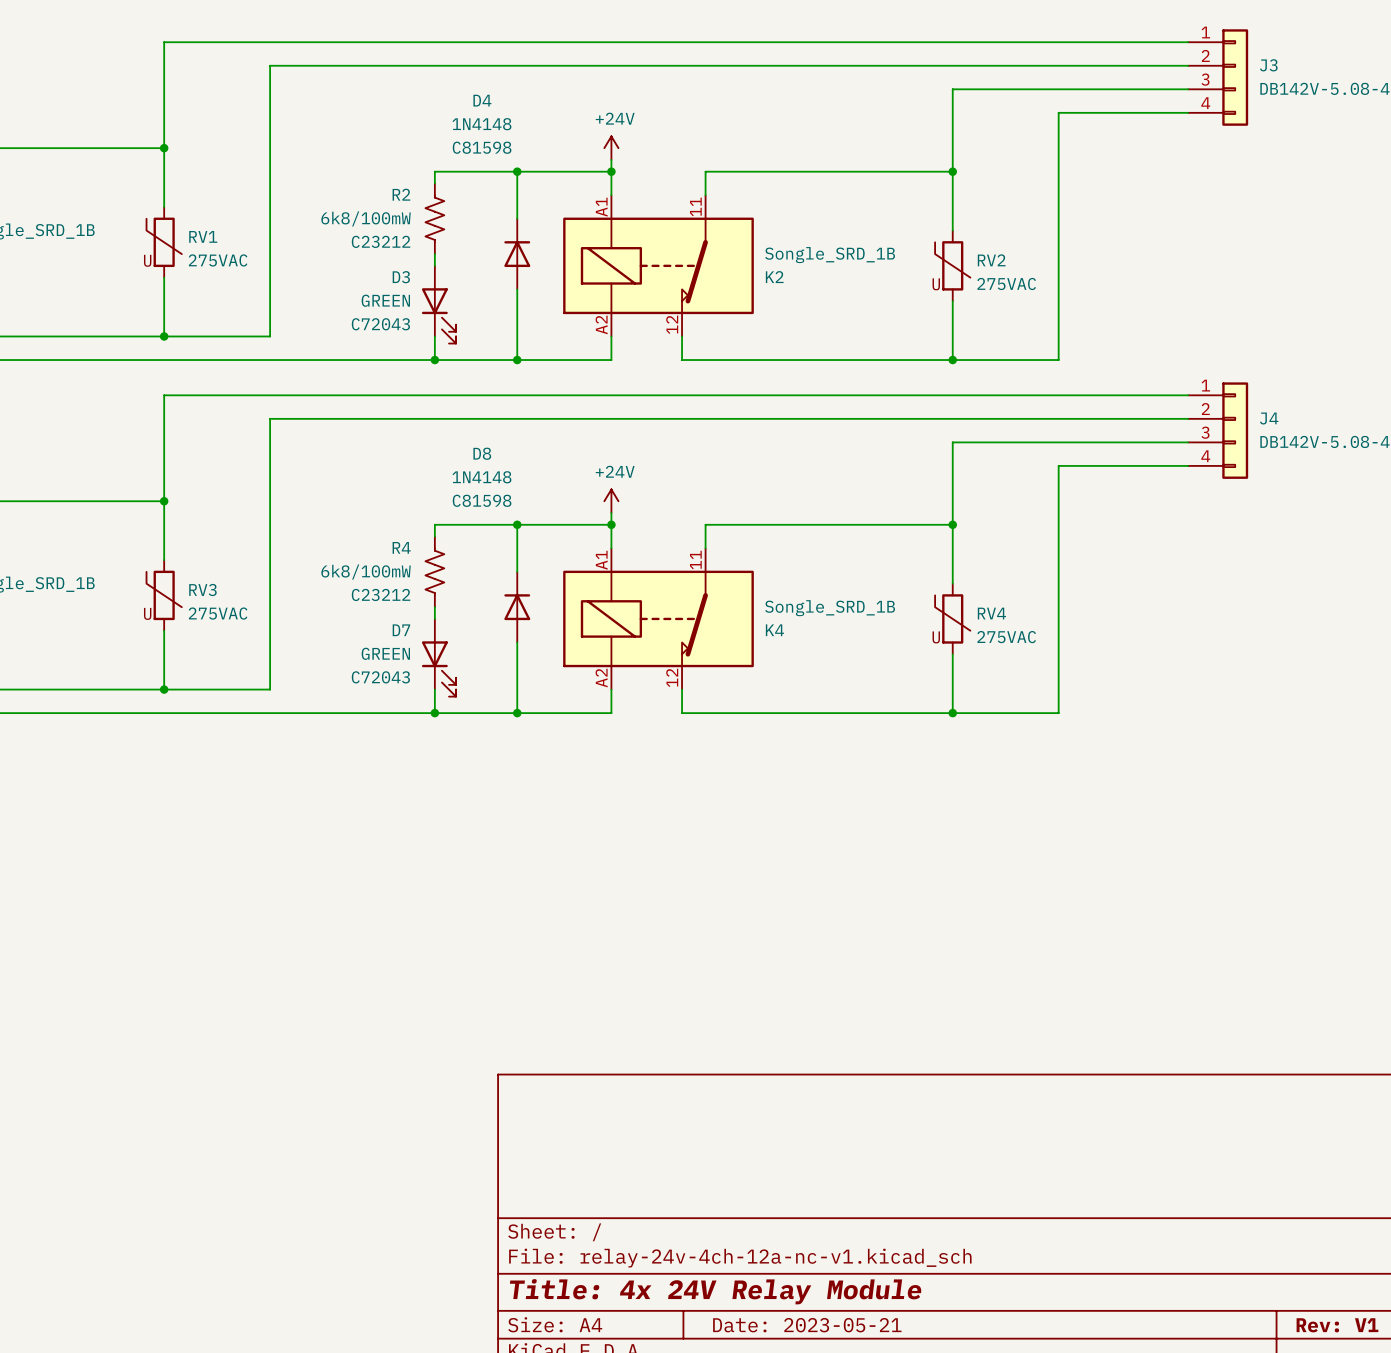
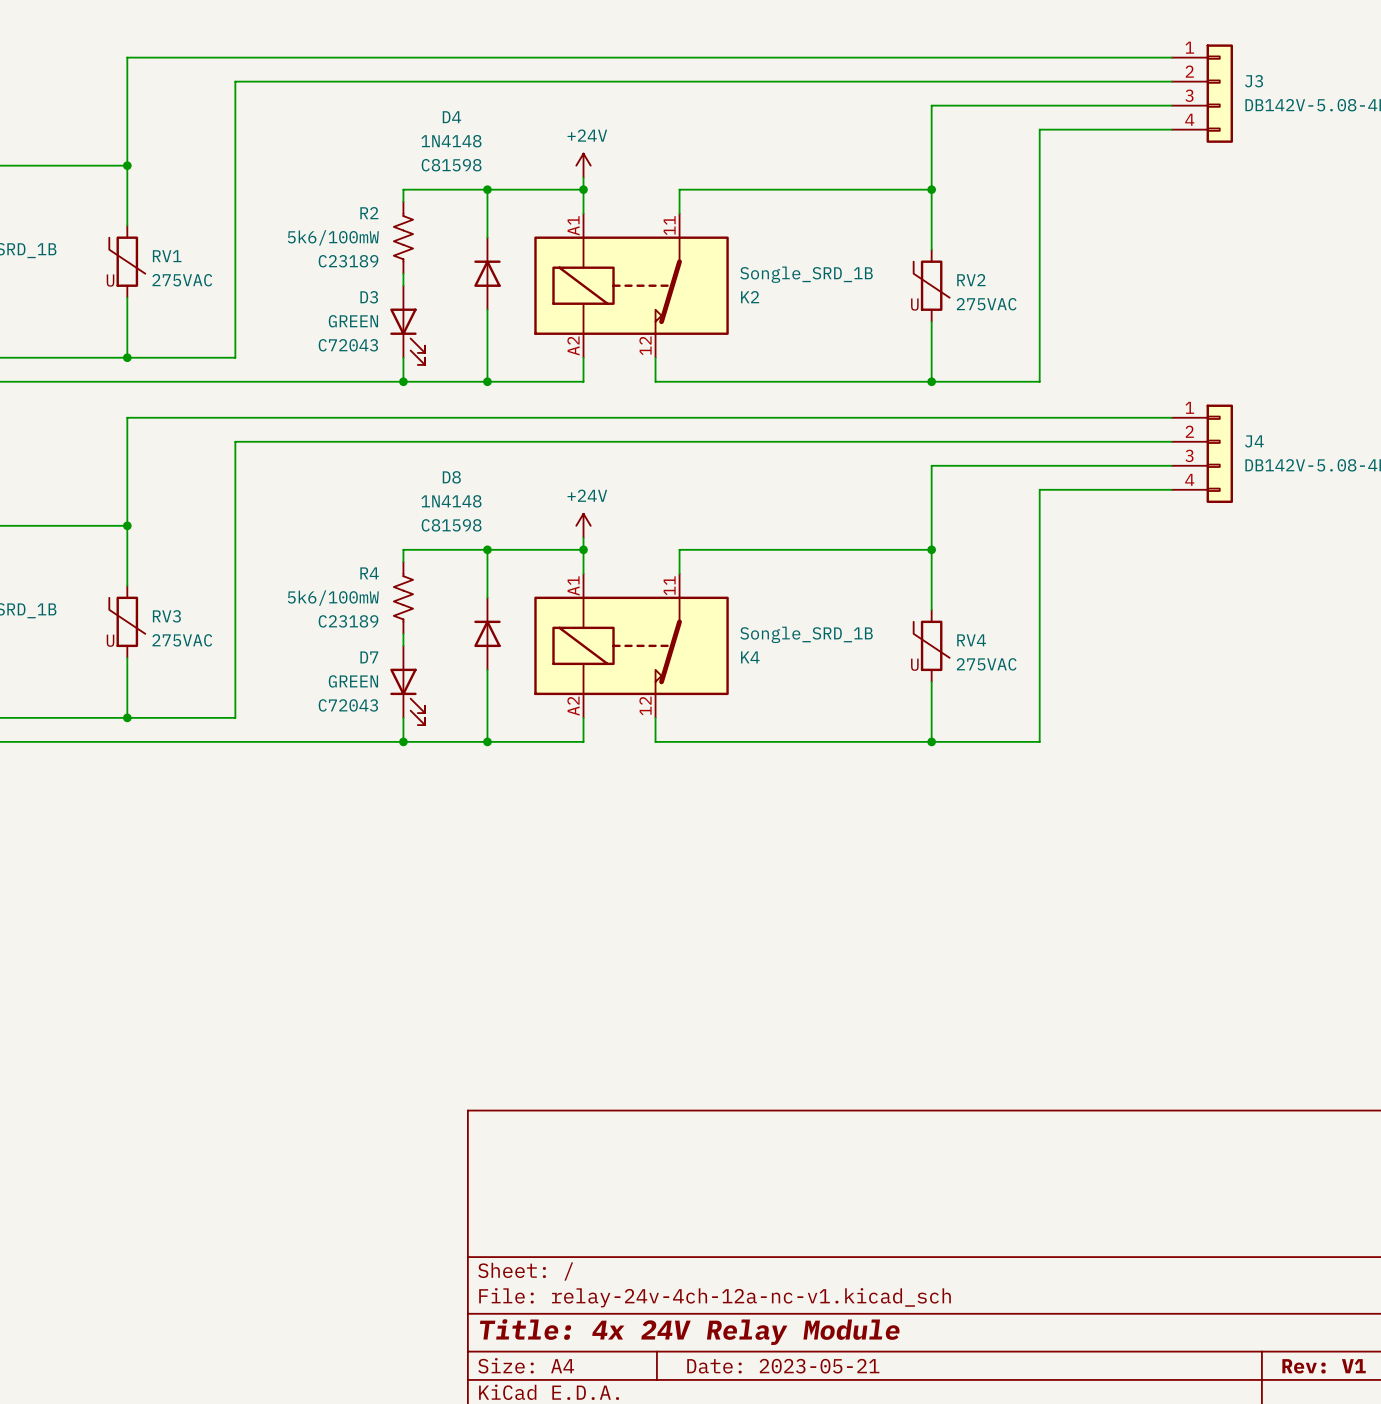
R2 value: 6k8/100mW (366, 218) -> 5k6/100mW (333, 237)
R2 text: C23212 (381, 241) -> C23189 (348, 261)
R4 value: 6k8/100mW (366, 572) -> 5k6/100mW (333, 598)
R4 text: C23212 (381, 594) -> C23189 (348, 621)

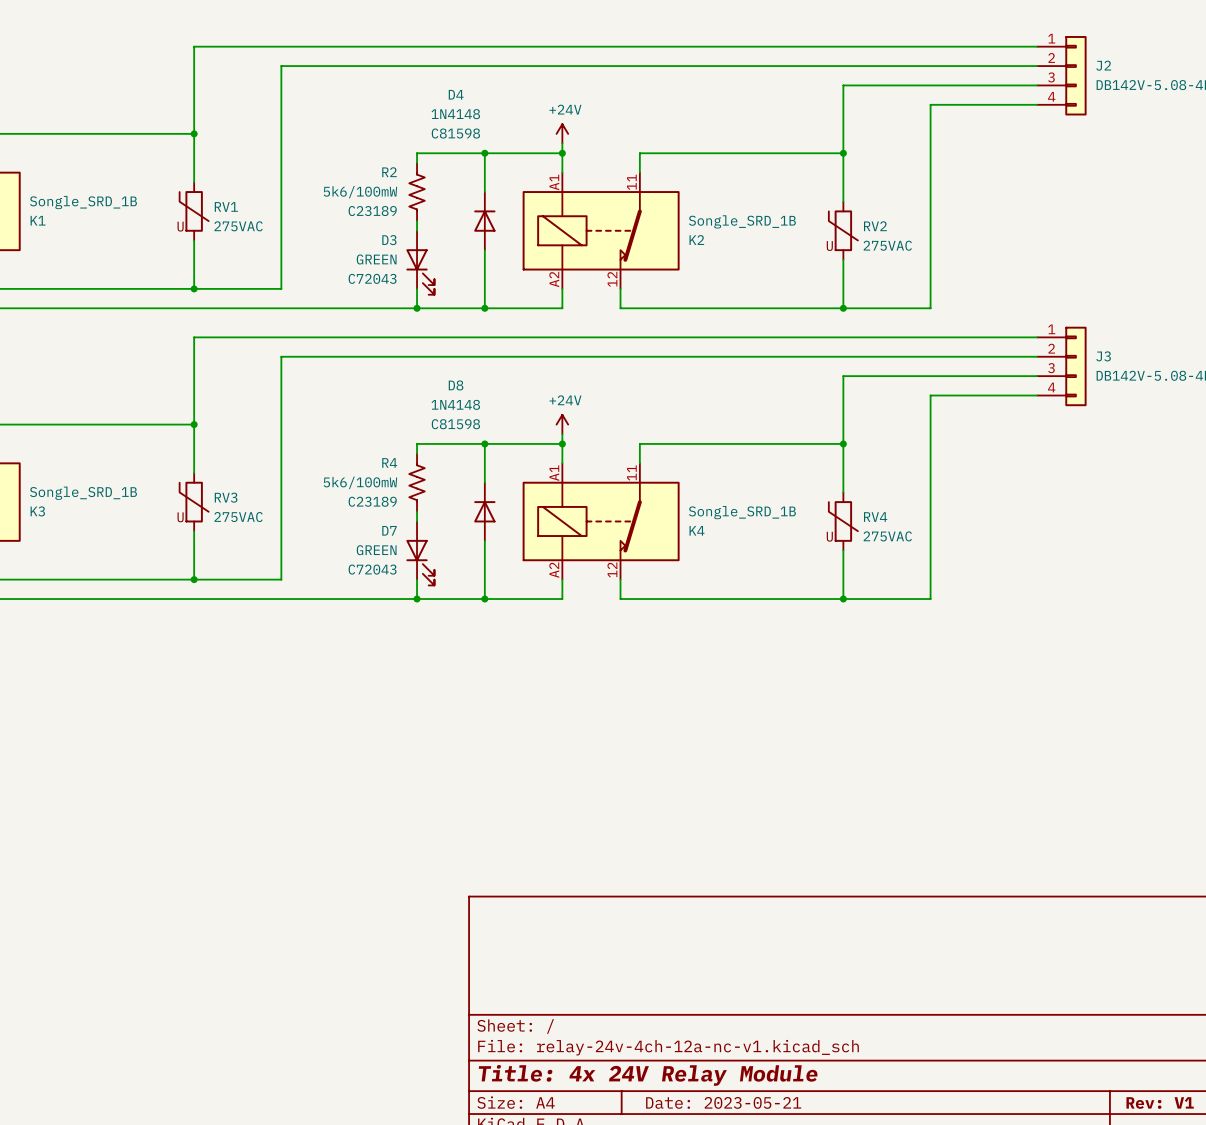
J3 name: J3 (1254, 81) -> J2 (1103, 65)
J4 name: J4 (1254, 441) -> J3 (1103, 356)

